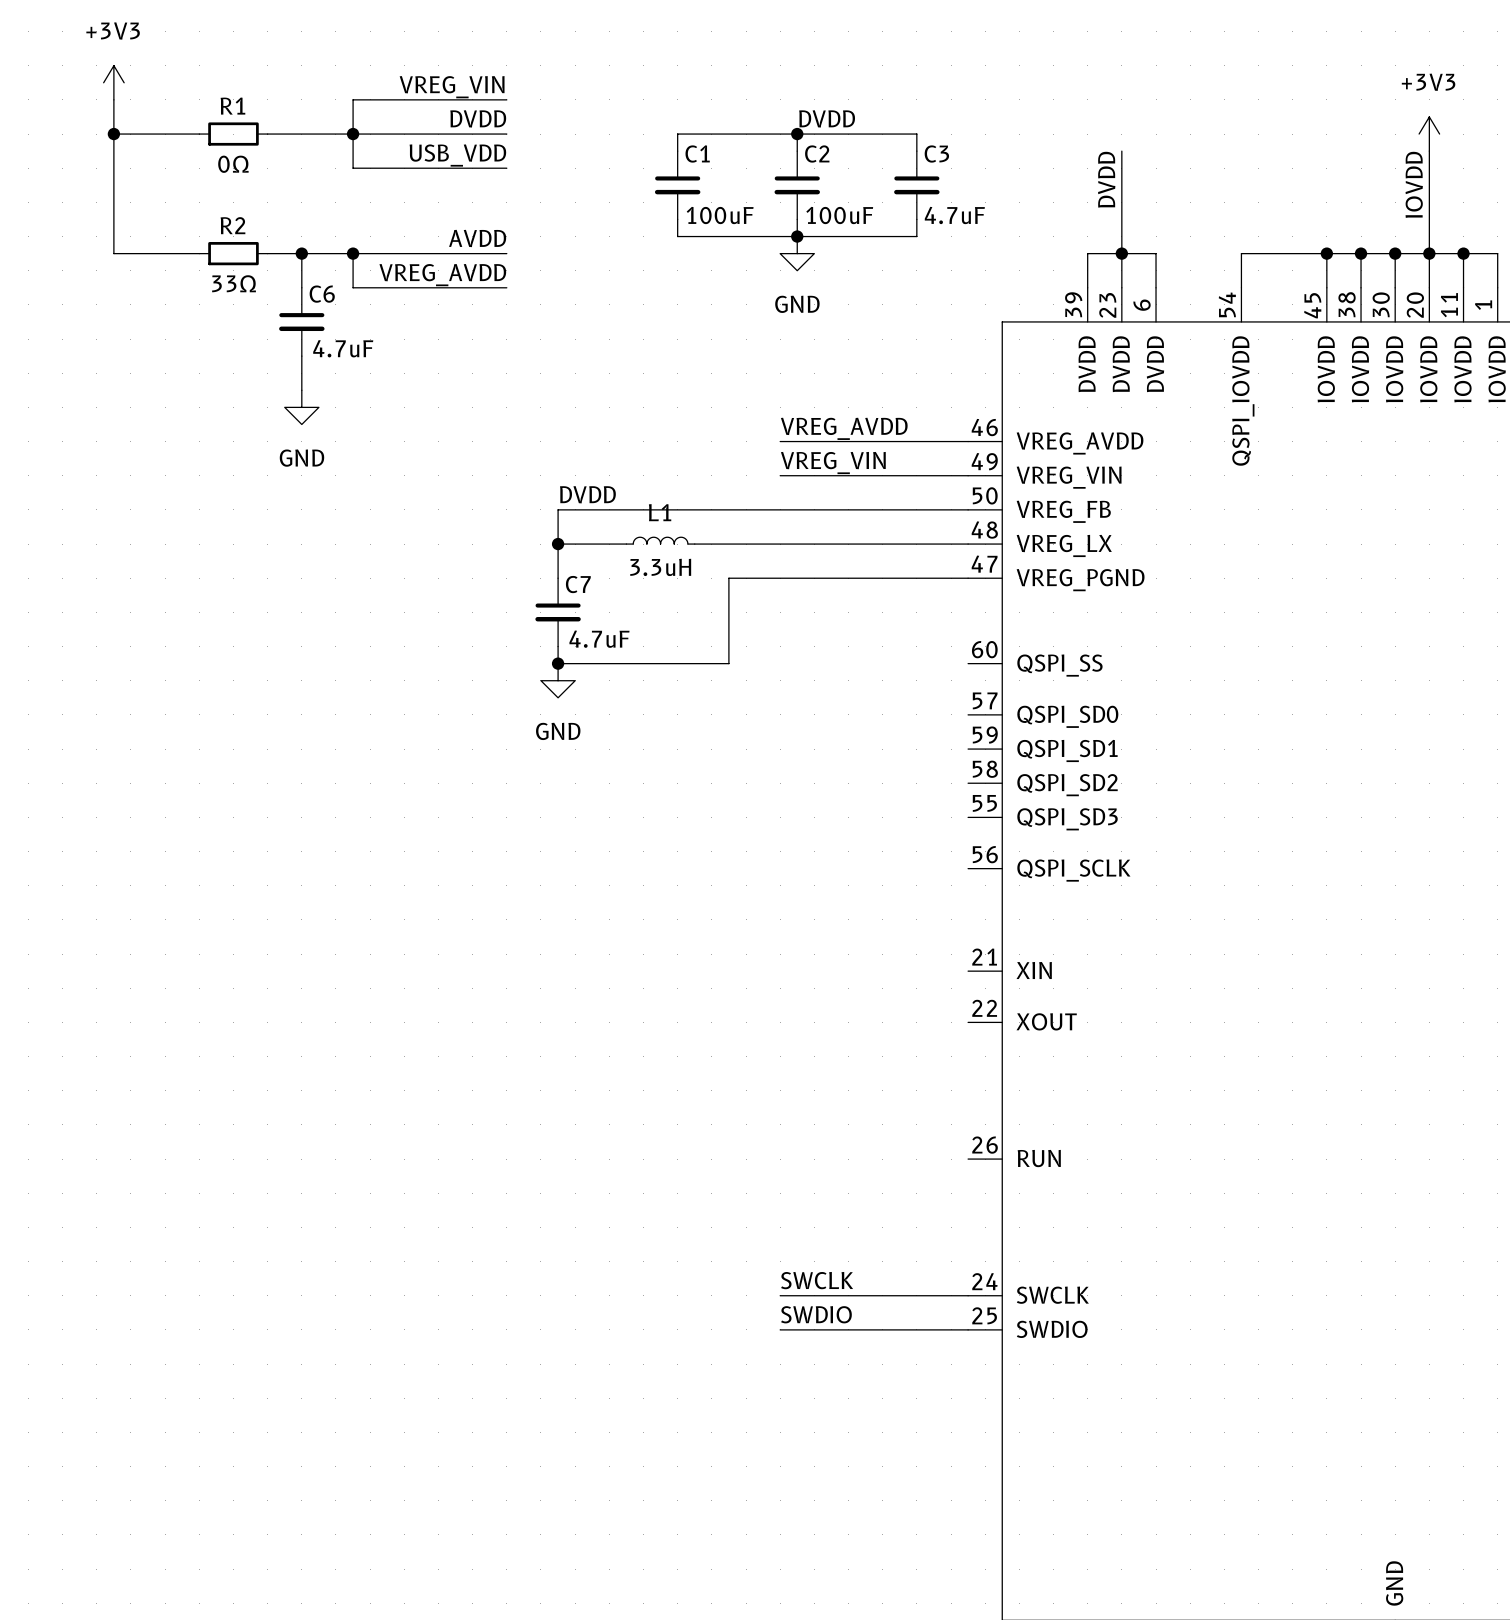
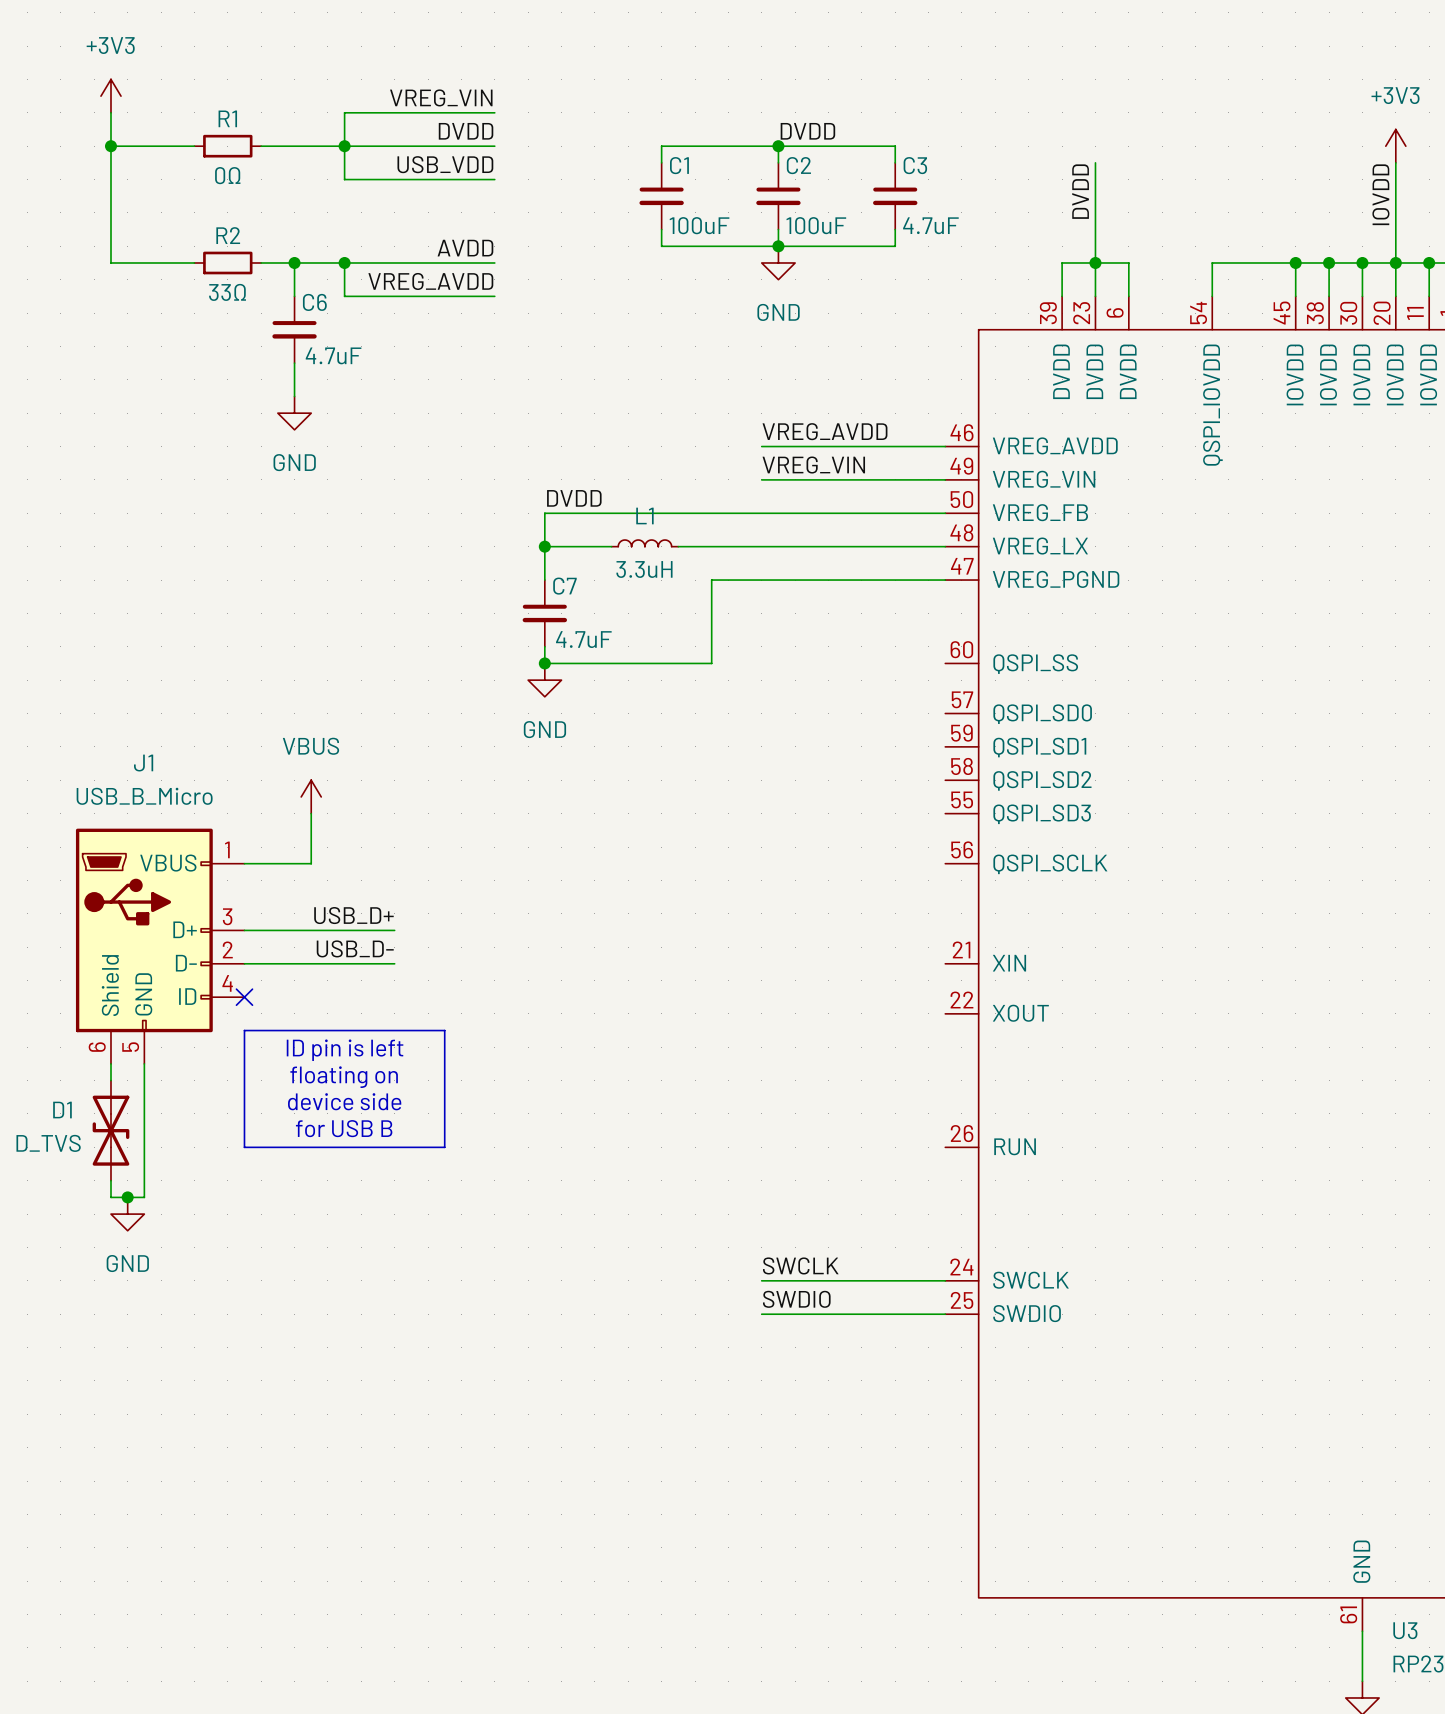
power symbol: none -> VBUS (311, 796)
wire: none -> (311, 813) (311, 863) (244, 863)
label: none -> USB_D+ (353, 915)
wire: none -> (244, 930) (394, 930)
J1: none -> USB_B_Micro (160, 946)
label: none -> USB_D- (355, 948)
wire: none -> (244, 963) (394, 963)
no-connect mark: none -> (244, 997)
line: none -> (244, 1030) (444, 1030) (444, 1147) (244, 1147) (244, 1030)
text: none -> ID pin is left (345, 1050)
wire: none -> (110, 1063) (110, 1080)
wire: none -> (144, 1063) (144, 1197) (110, 1197) (110, 1180)
text: none -> floating on (344, 1077)
text: none -> device side (344, 1101)
text: none -> for USB B (344, 1128)
D1: none -> D_TVS (110, 1130)
junction: none -> (127, 1197)
power symbol: none -> GND (127, 1214)

